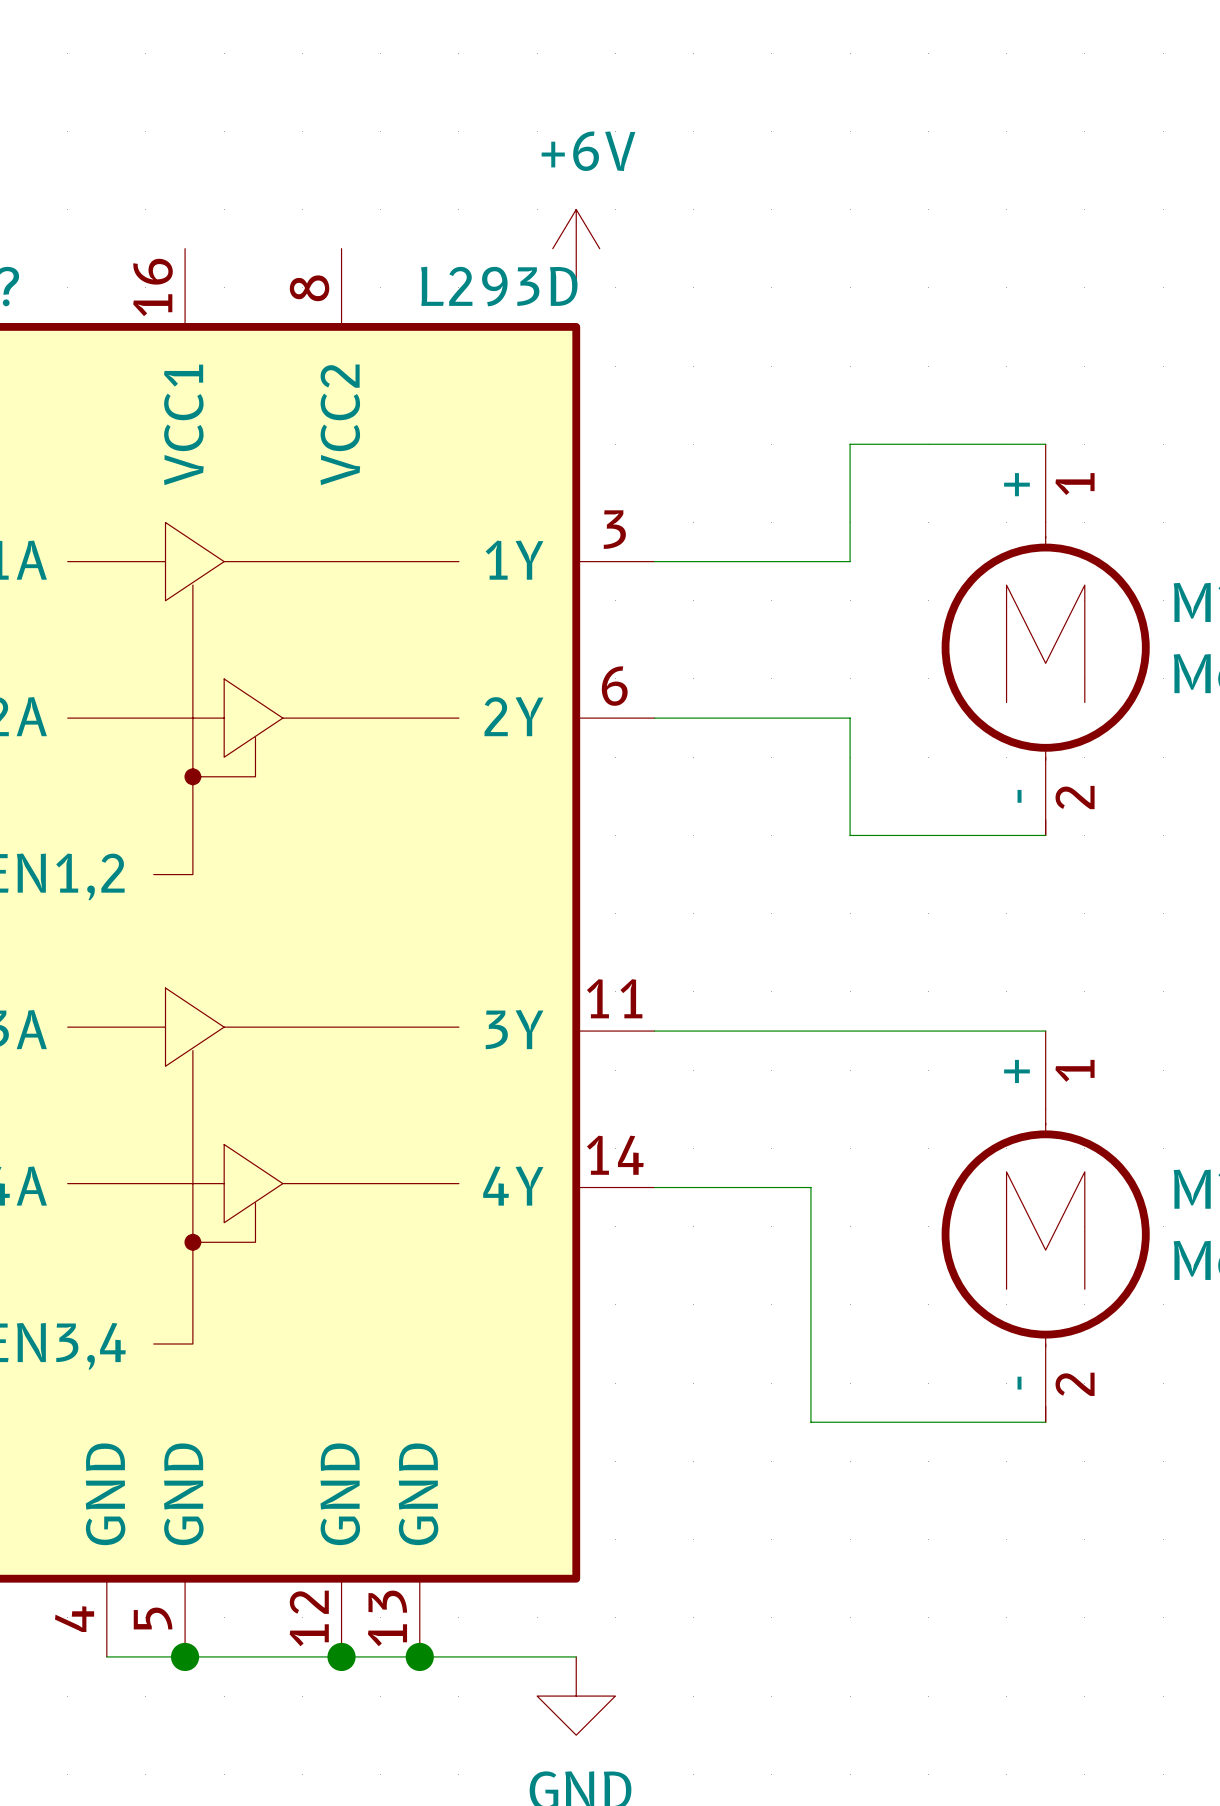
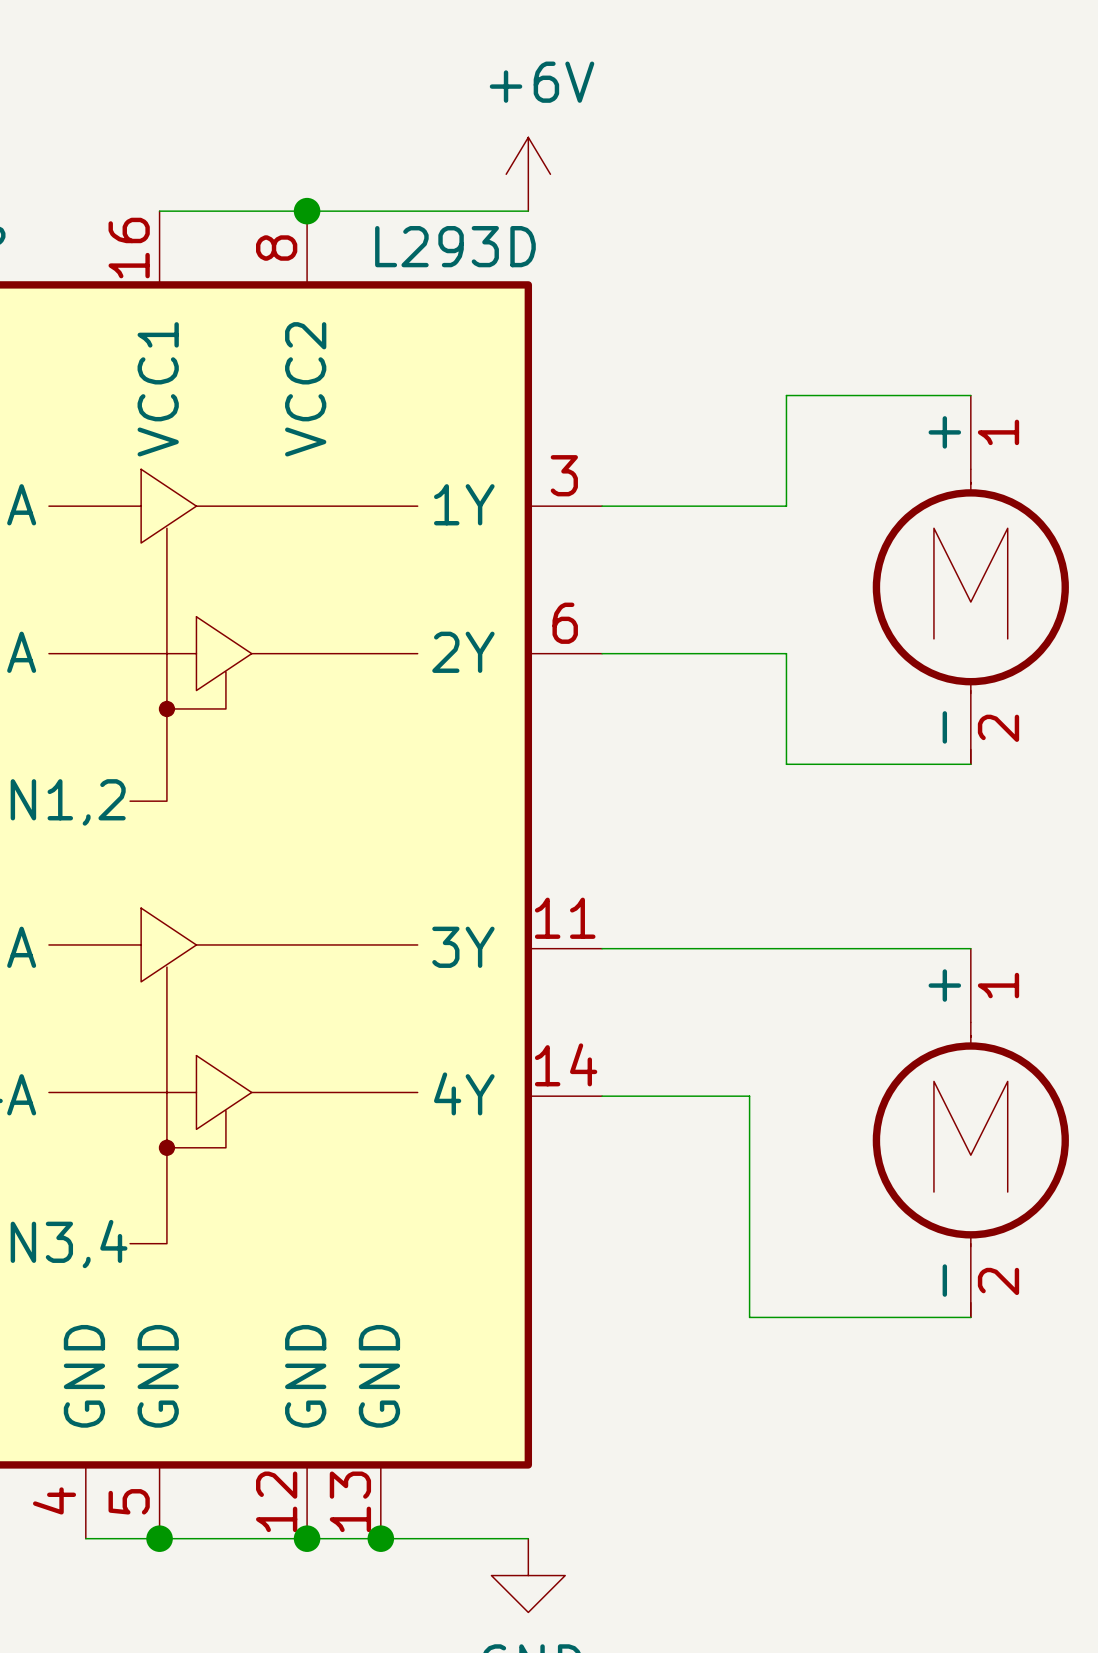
wire: none -> (159, 211) (528, 211)
junction: none -> (307, 211)
power symbol position: +6V (576, 248) -> +6V (528, 174)

